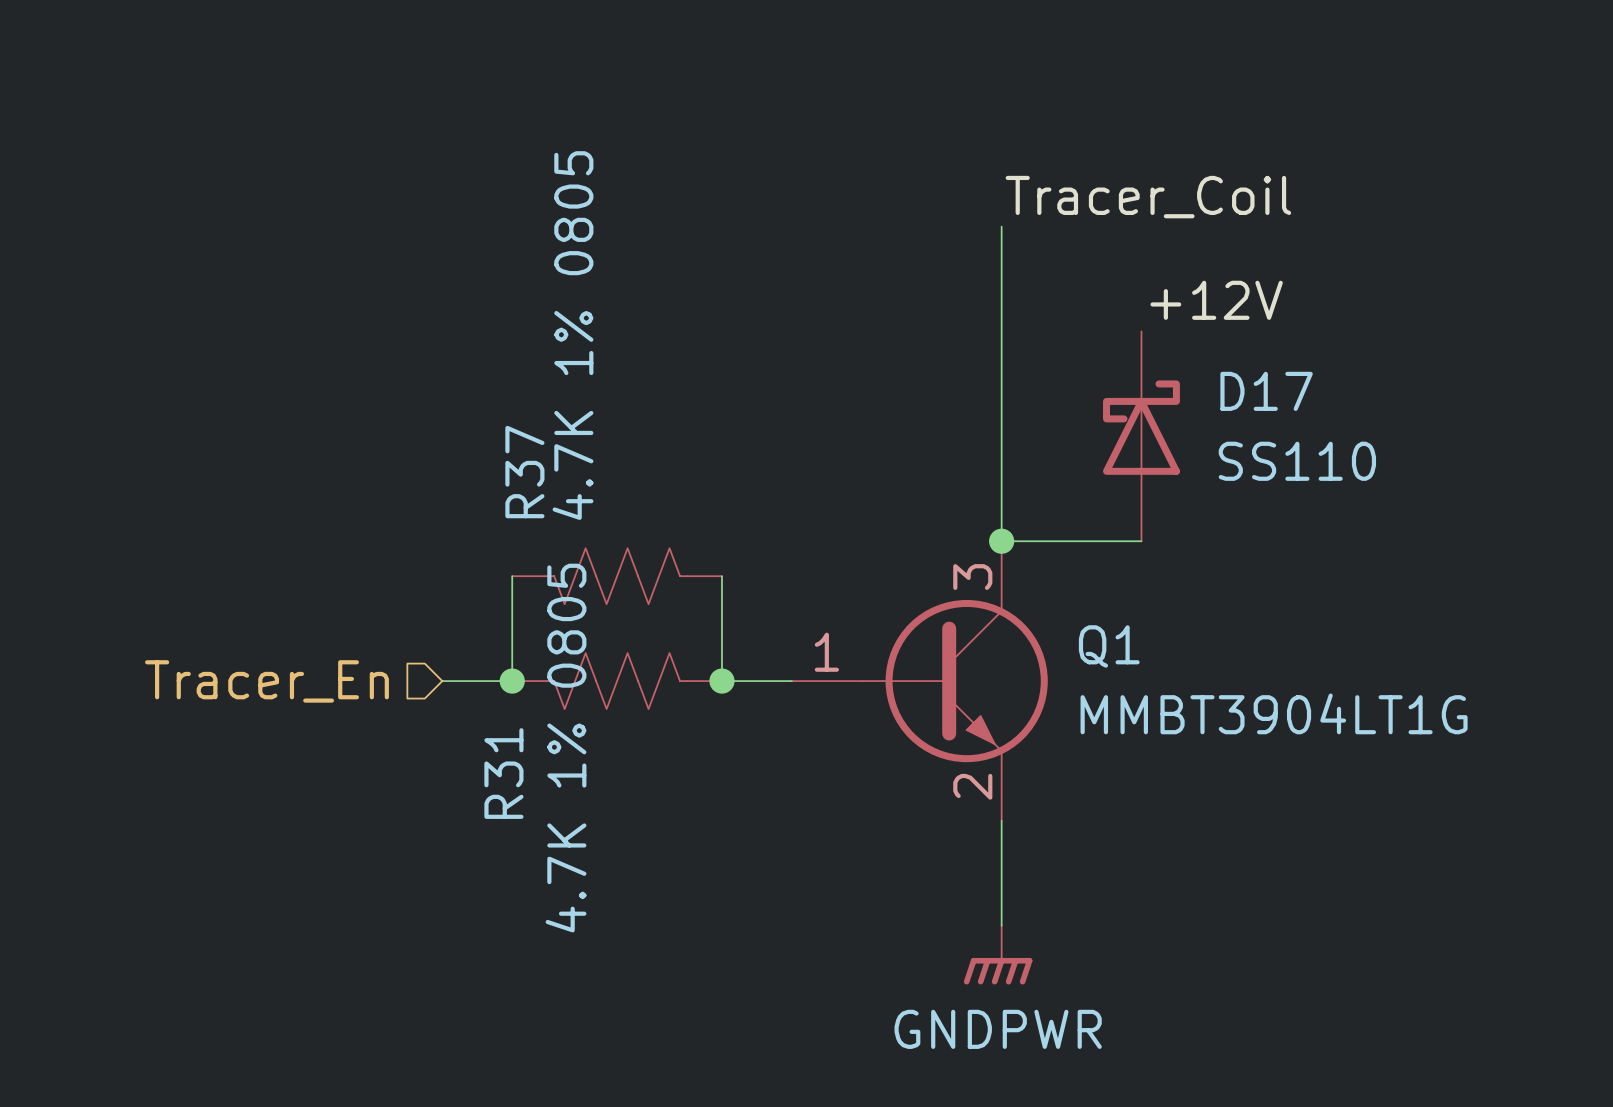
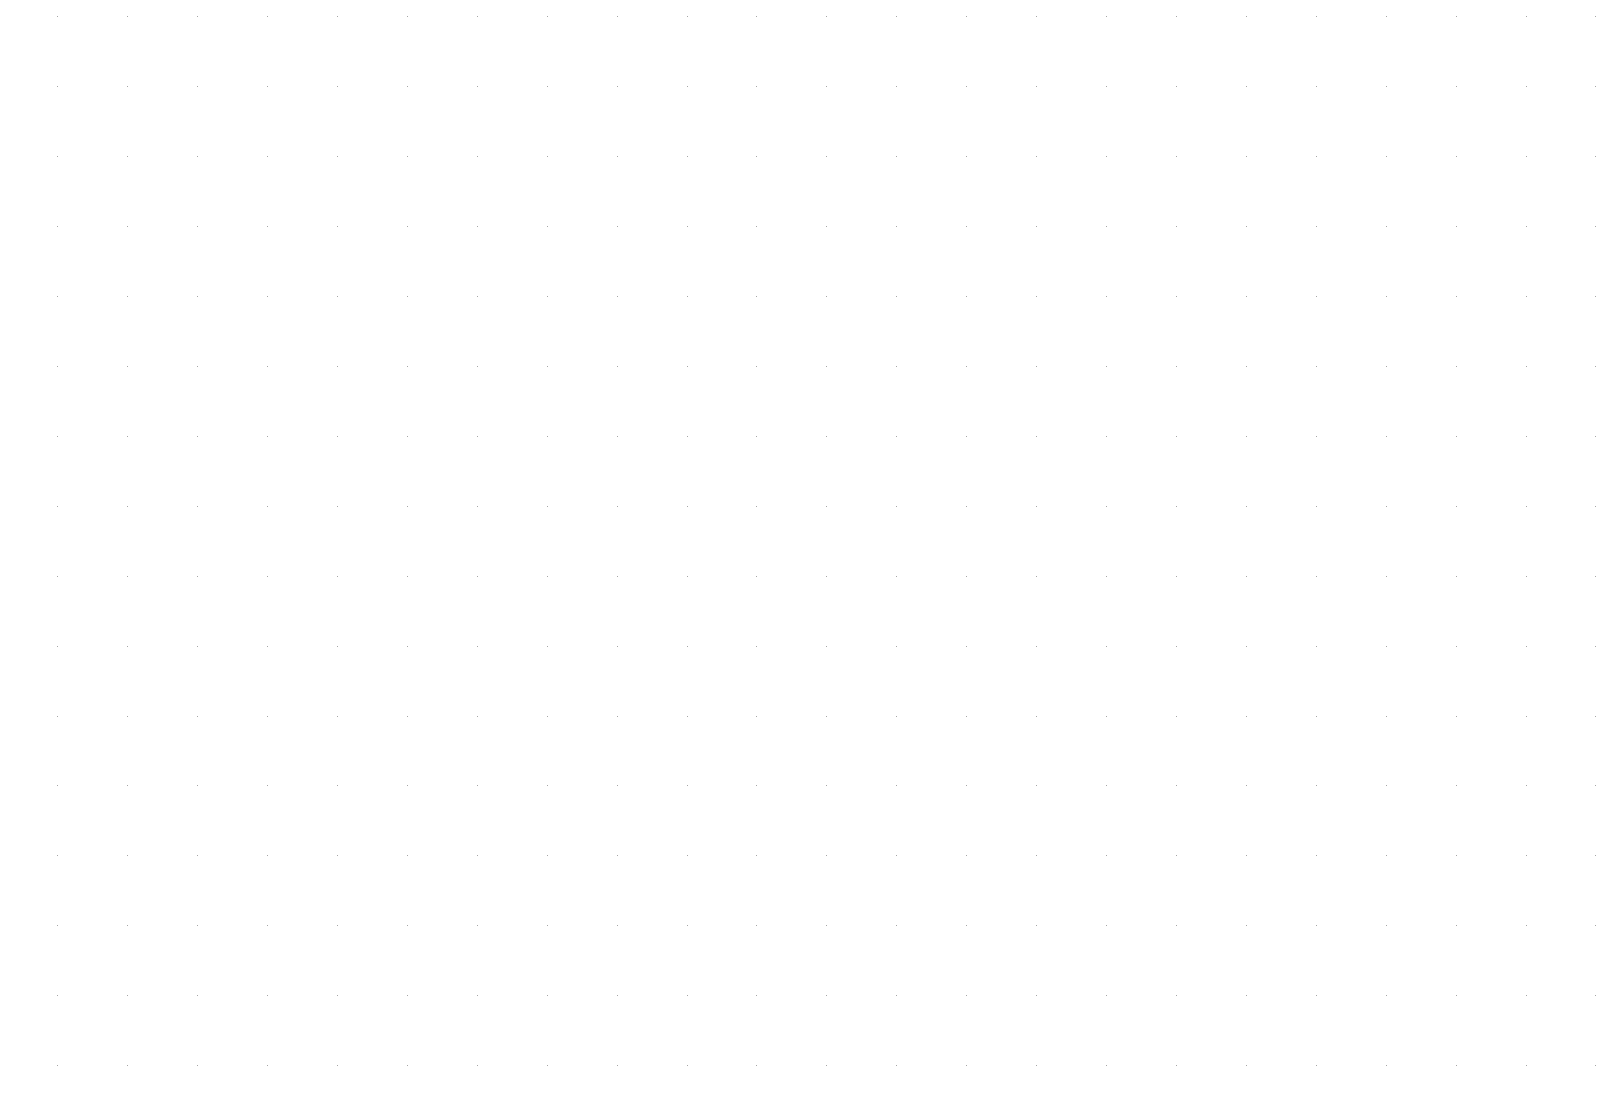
label: Tracer_Coil (1148, 197) -> none
wire: (1001, 226) (1001, 541) (1141, 541) -> none
label: +12V (1216, 300) -> none
D17: SS110 (1141, 436) -> none
junction: (1001, 541) -> none
wire: (512, 576) (512, 681) (442, 681) -> none
R37: 4.7K 1% 0805 (617, 576) -> none
wire: (721, 576) (721, 681) (791, 681) -> none
hierarchical label: Tracer_En (266, 681) -> none
junction: (512, 681) -> none
R31: 4.7K 1% 0805 (617, 681) -> none
junction: (721, 681) -> none
Q1: MMBT3904LT1G (919, 681) -> none
wire: (1001, 820) (1001, 925) -> none
power symbol: GNDPWR (998, 955) -> none

